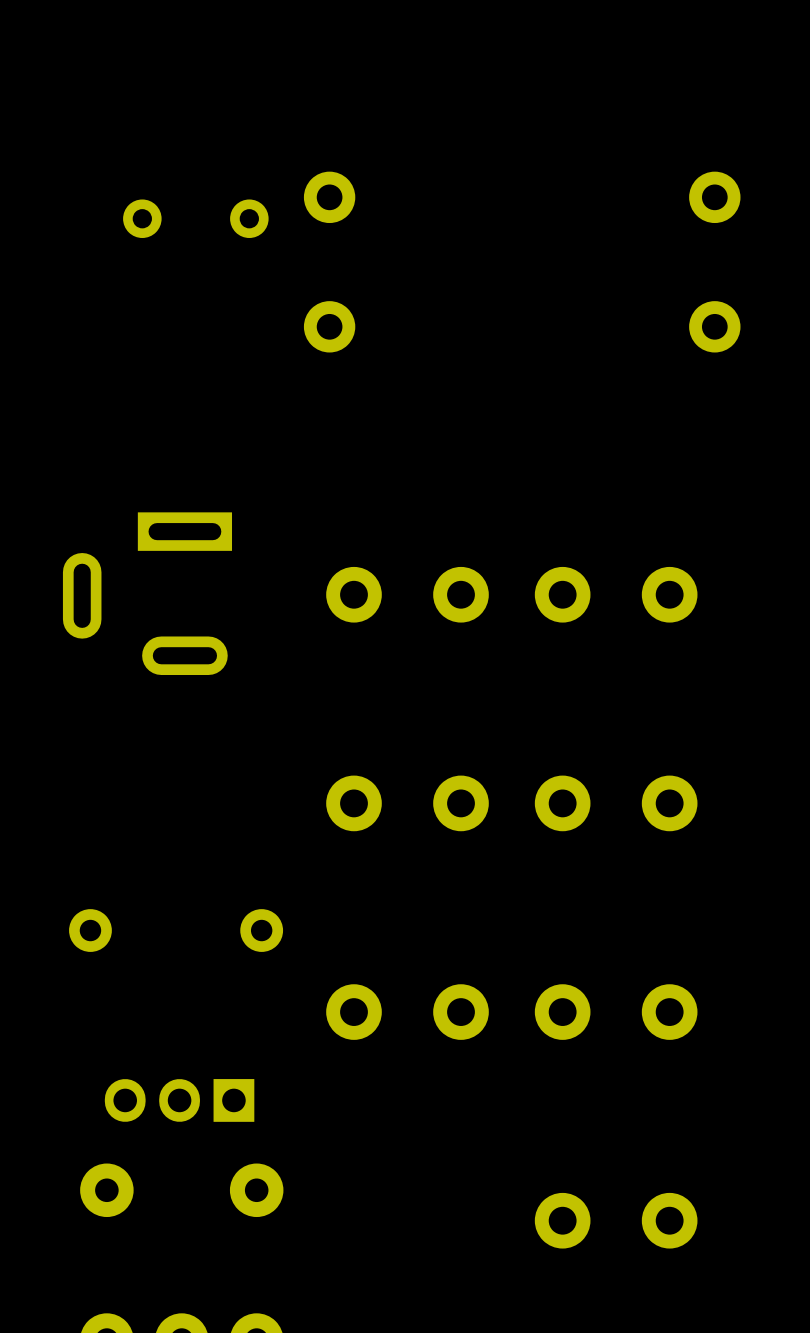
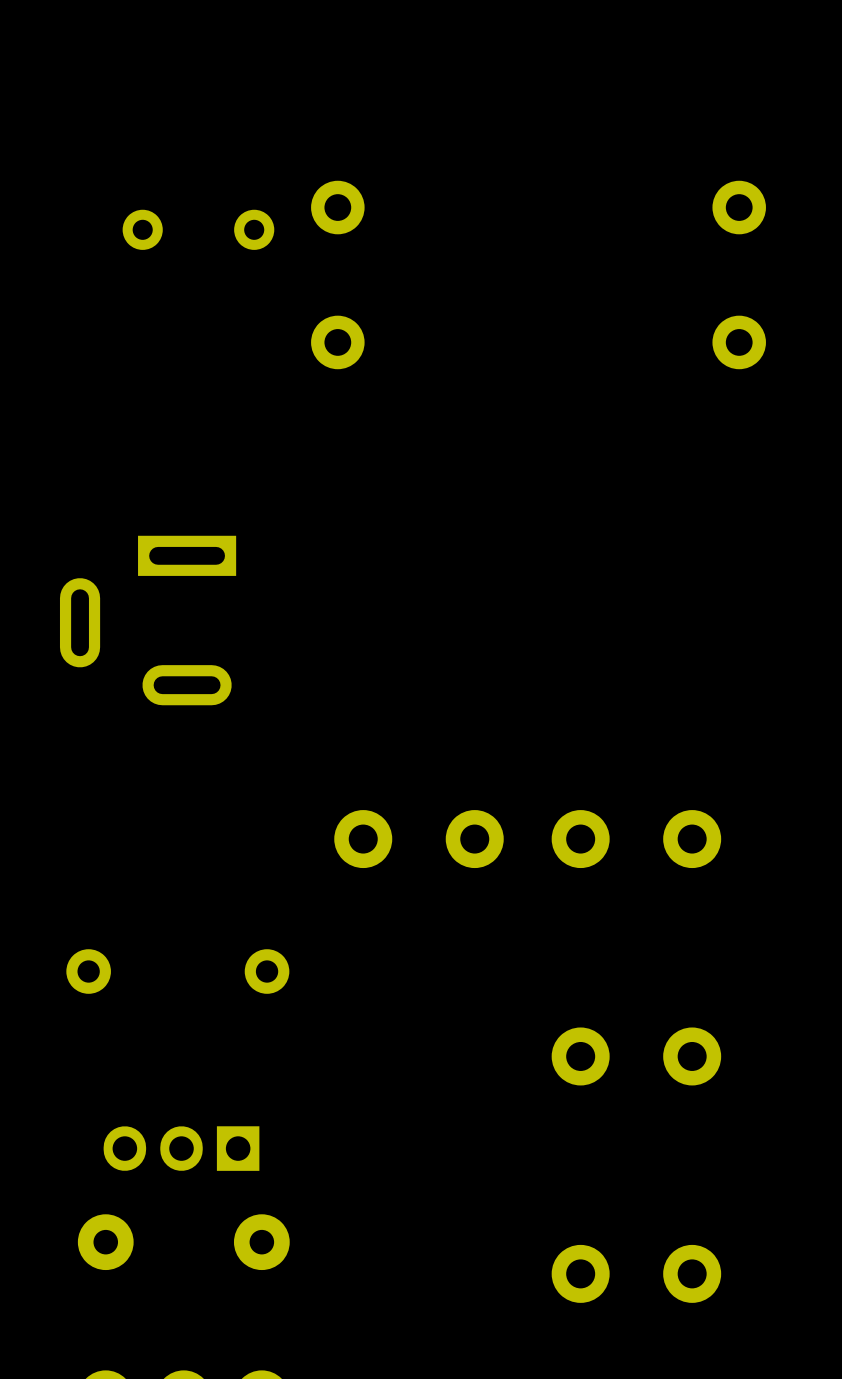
part: (407, 594) -> none
part: (616, 594) -> none
part: (407, 1012) -> none

